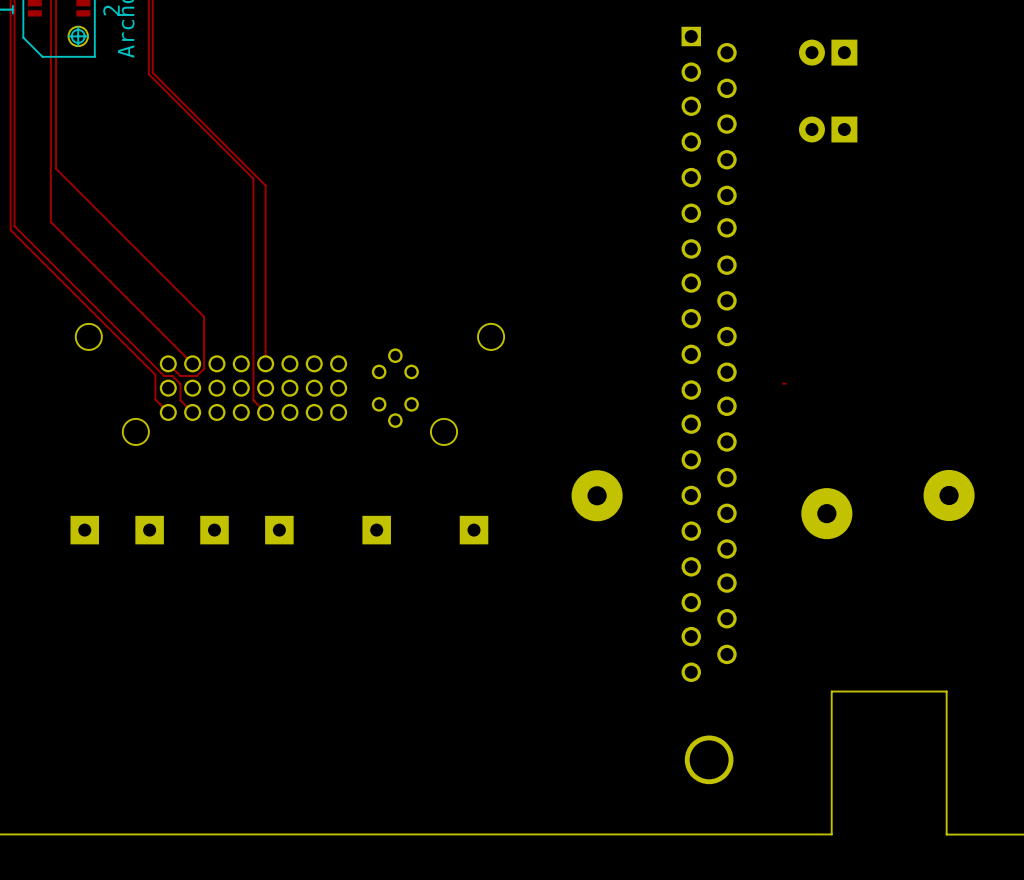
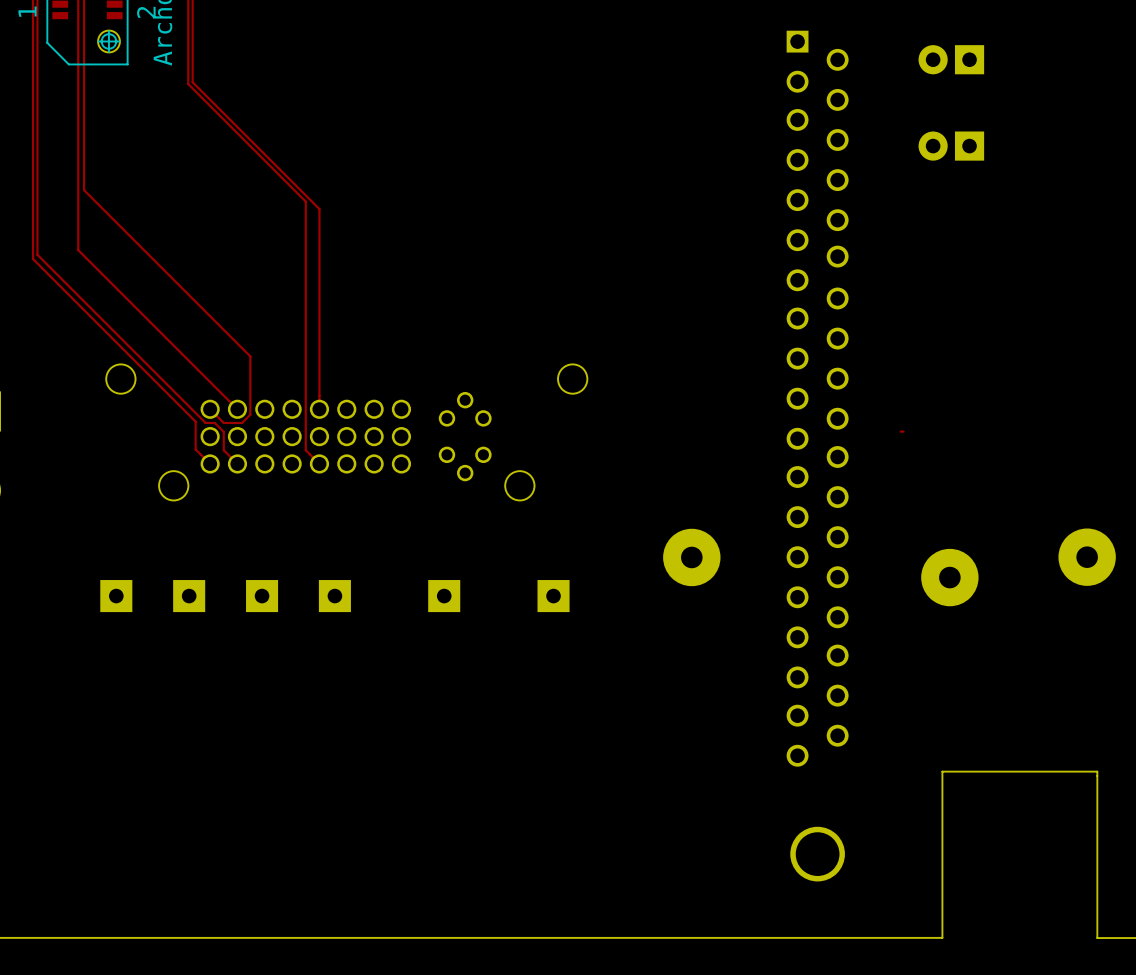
board edge: (820, 834) (831, 834) (831, 691) (946, 691) (946, 834) (958, 834) -> (942, 937) (942, 771) (1097, 771) (1097, 938)

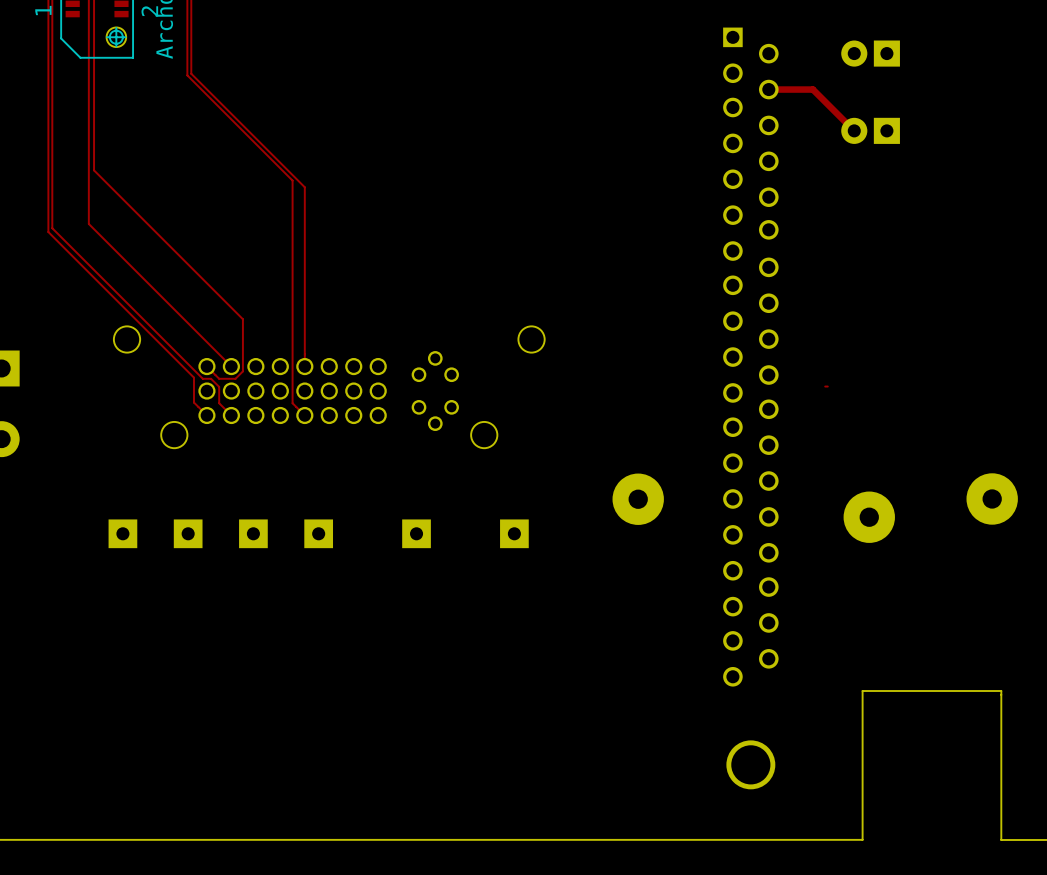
track: none -> (768, 89) (812, 89) (854, 130)

